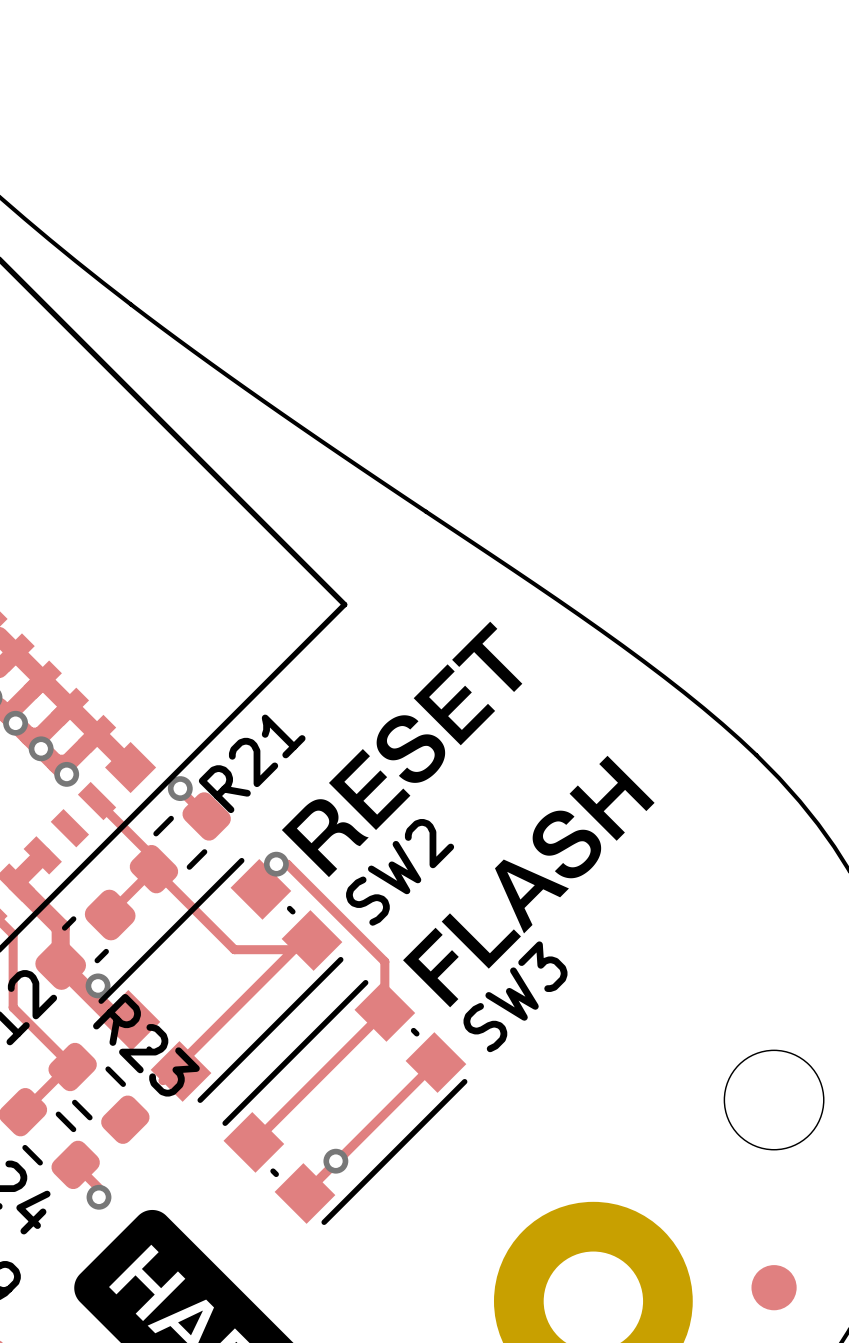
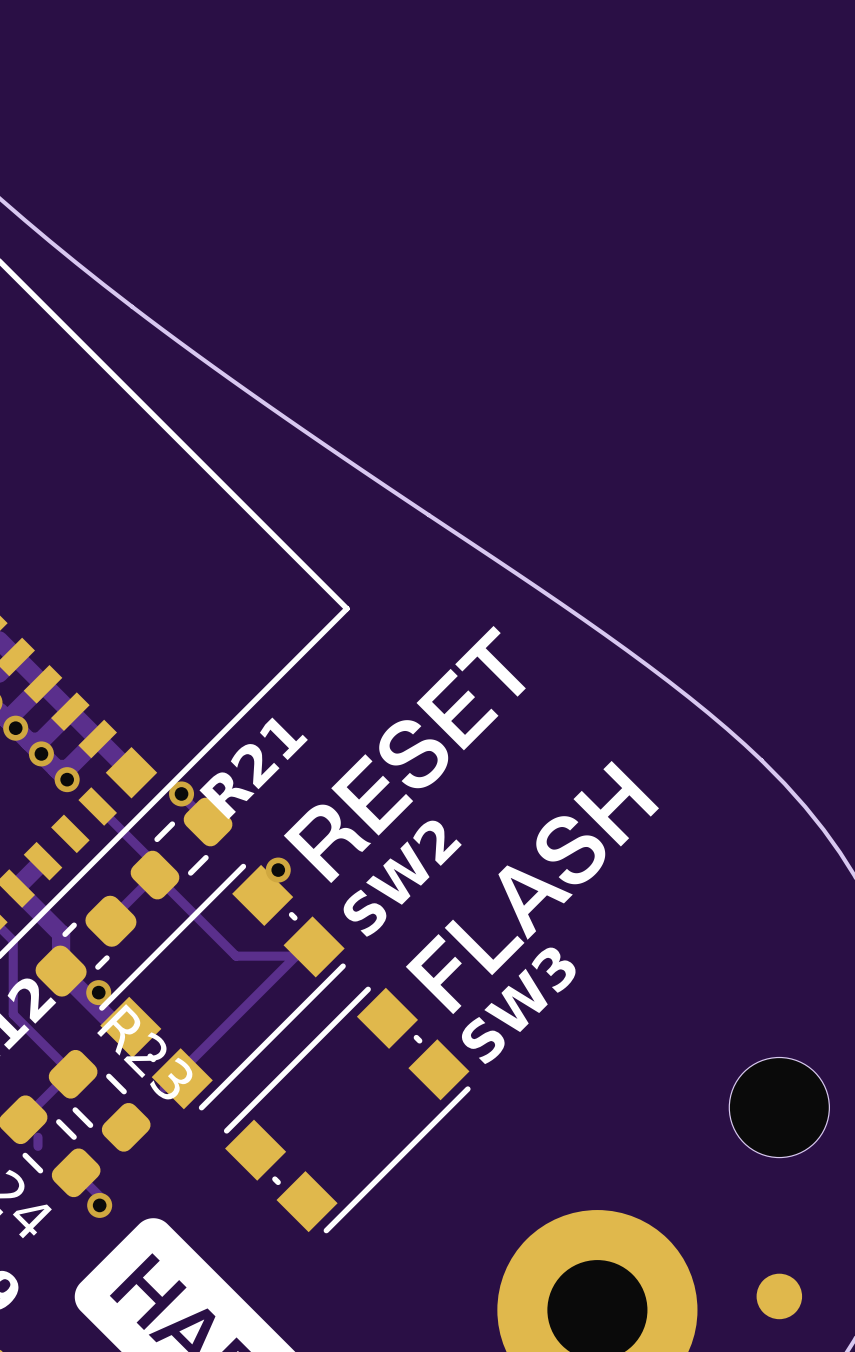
track: (276, 864) (287, 864) (384, 961) (384, 1011) (253, 1142) -> none
track: (435, 1062) (304, 1193) -> none
track: none -> (37, 1137) (37, 1146)
via: (335, 1161) -> none

